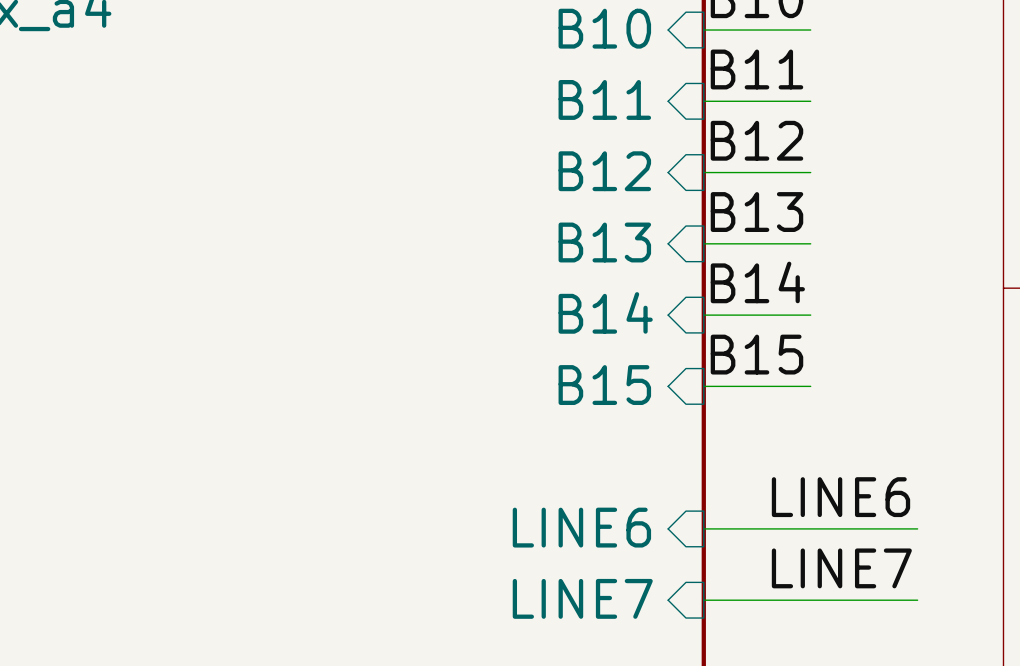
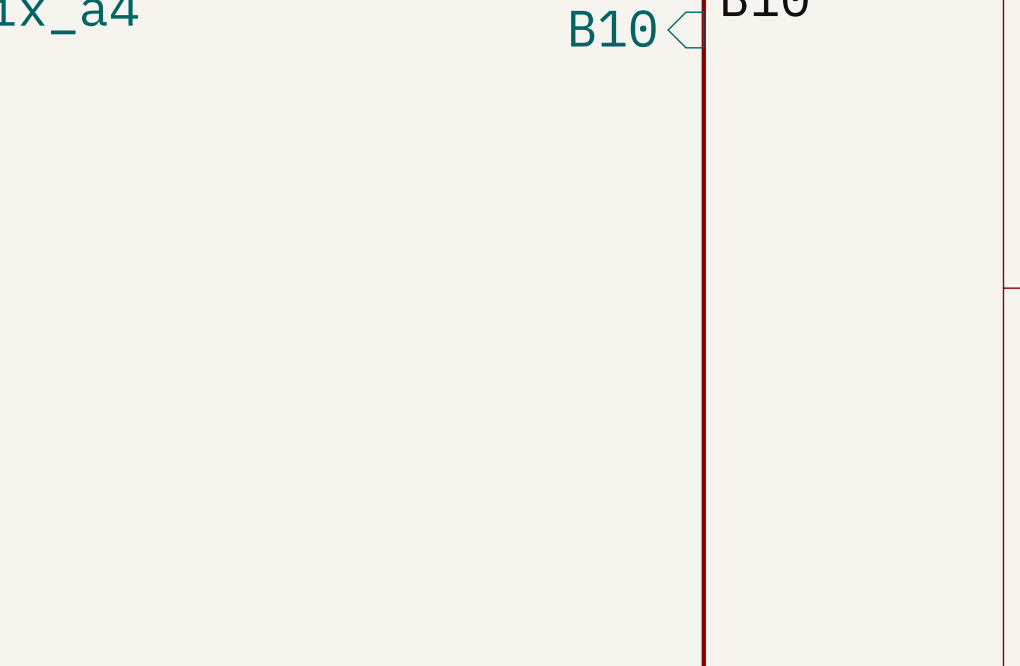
wire: (703, 30) (810, 30) -> none
label: B11 (756, 69) -> none
sheet pin: B11 (604, 99) -> none
wire: (703, 101) (810, 101) -> none
label: B12 (756, 140) -> none
sheet pin: B12 (604, 171) -> none
wire: (703, 172) (810, 172) -> none
label: B13 (756, 212) -> none
sheet pin: B13 (604, 242) -> none
wire: (703, 243) (810, 243) -> none
label: B14 (757, 282) -> none
sheet pin: B14 (605, 312) -> none
wire: (703, 315) (810, 315) -> none
label: B15 (756, 354) -> none
sheet pin: B15 (604, 385) -> none
wire: (703, 386) (810, 386) -> none
label: LINE6 (840, 497) -> none
sheet pin: LINE6 (581, 527) -> none
wire: (703, 528) (917, 528) -> none
label: LINE7 (841, 568) -> none
sheet pin: LINE7 (582, 598) -> none
wire: (703, 600) (917, 600) -> none

